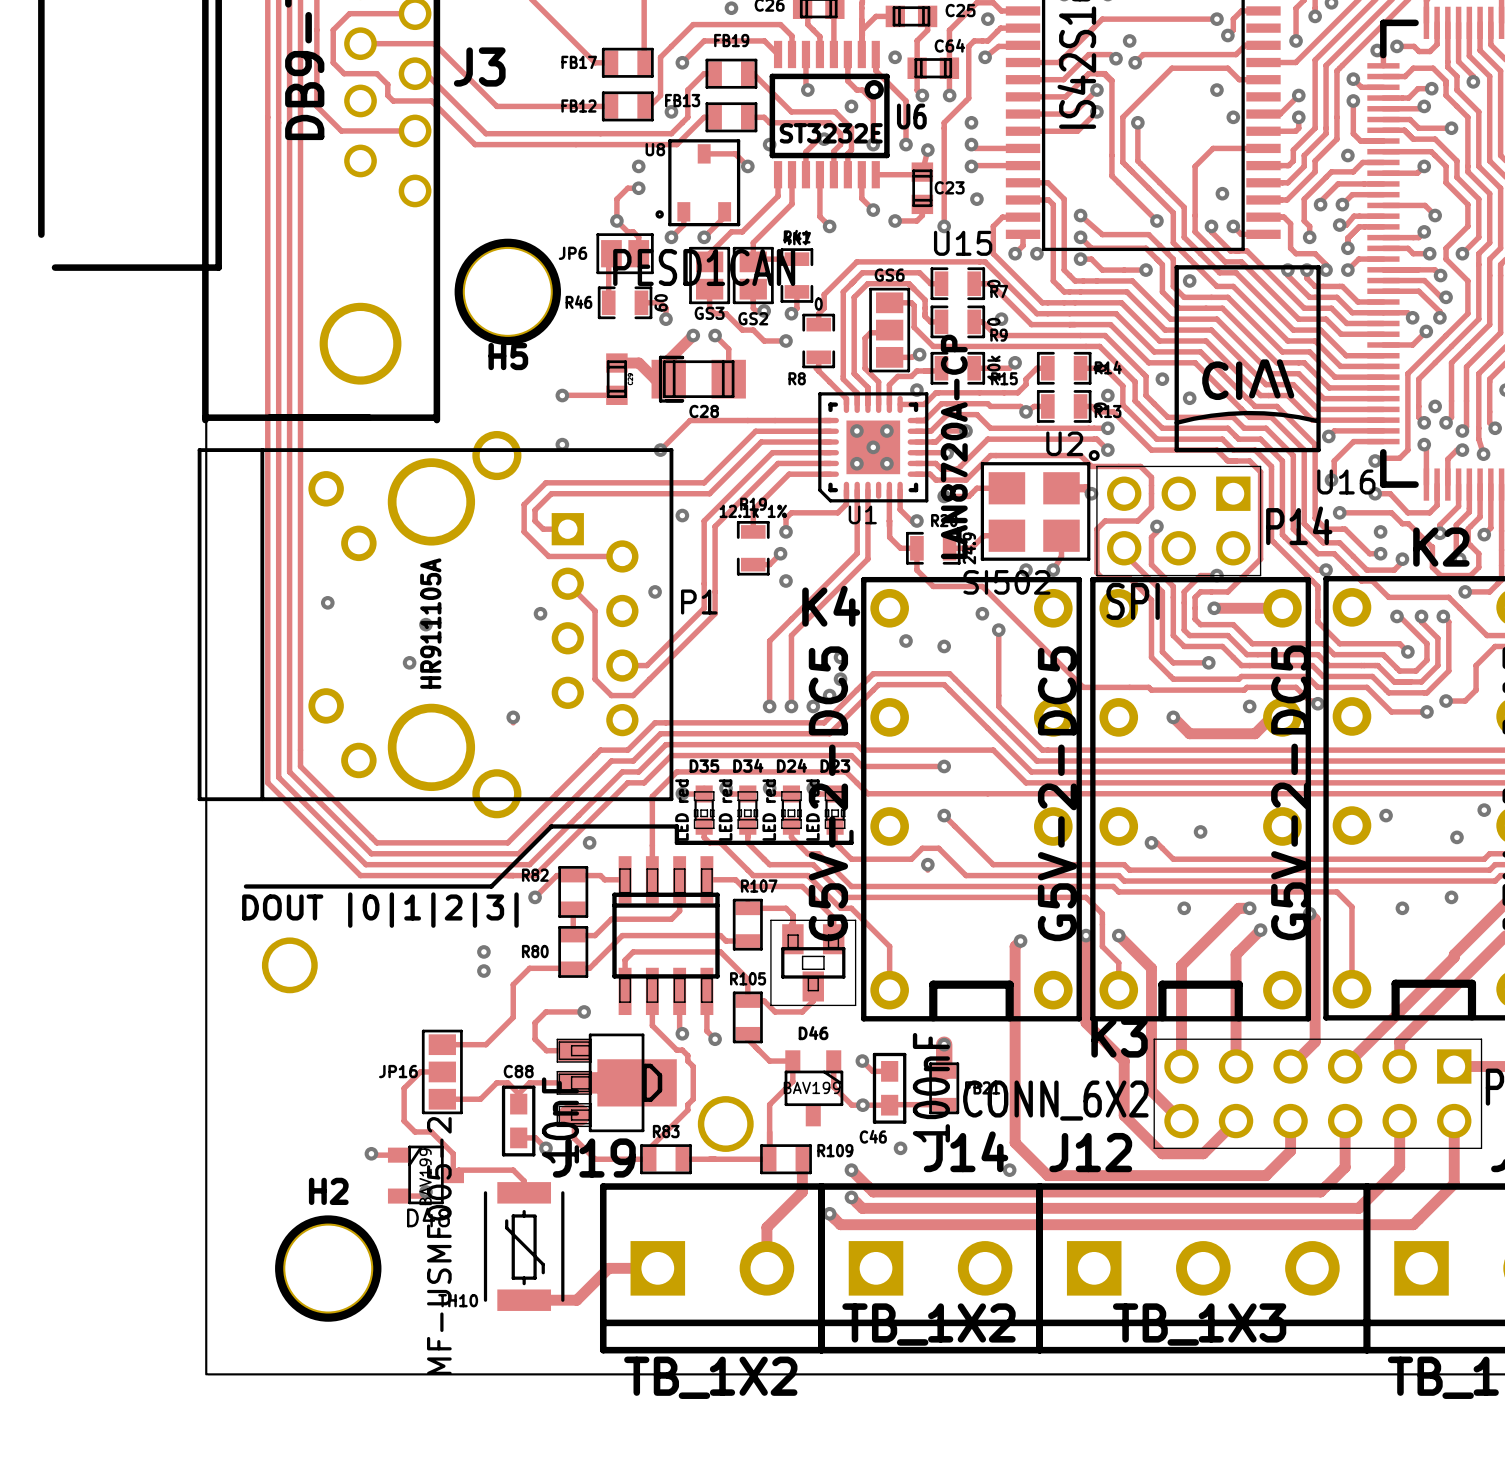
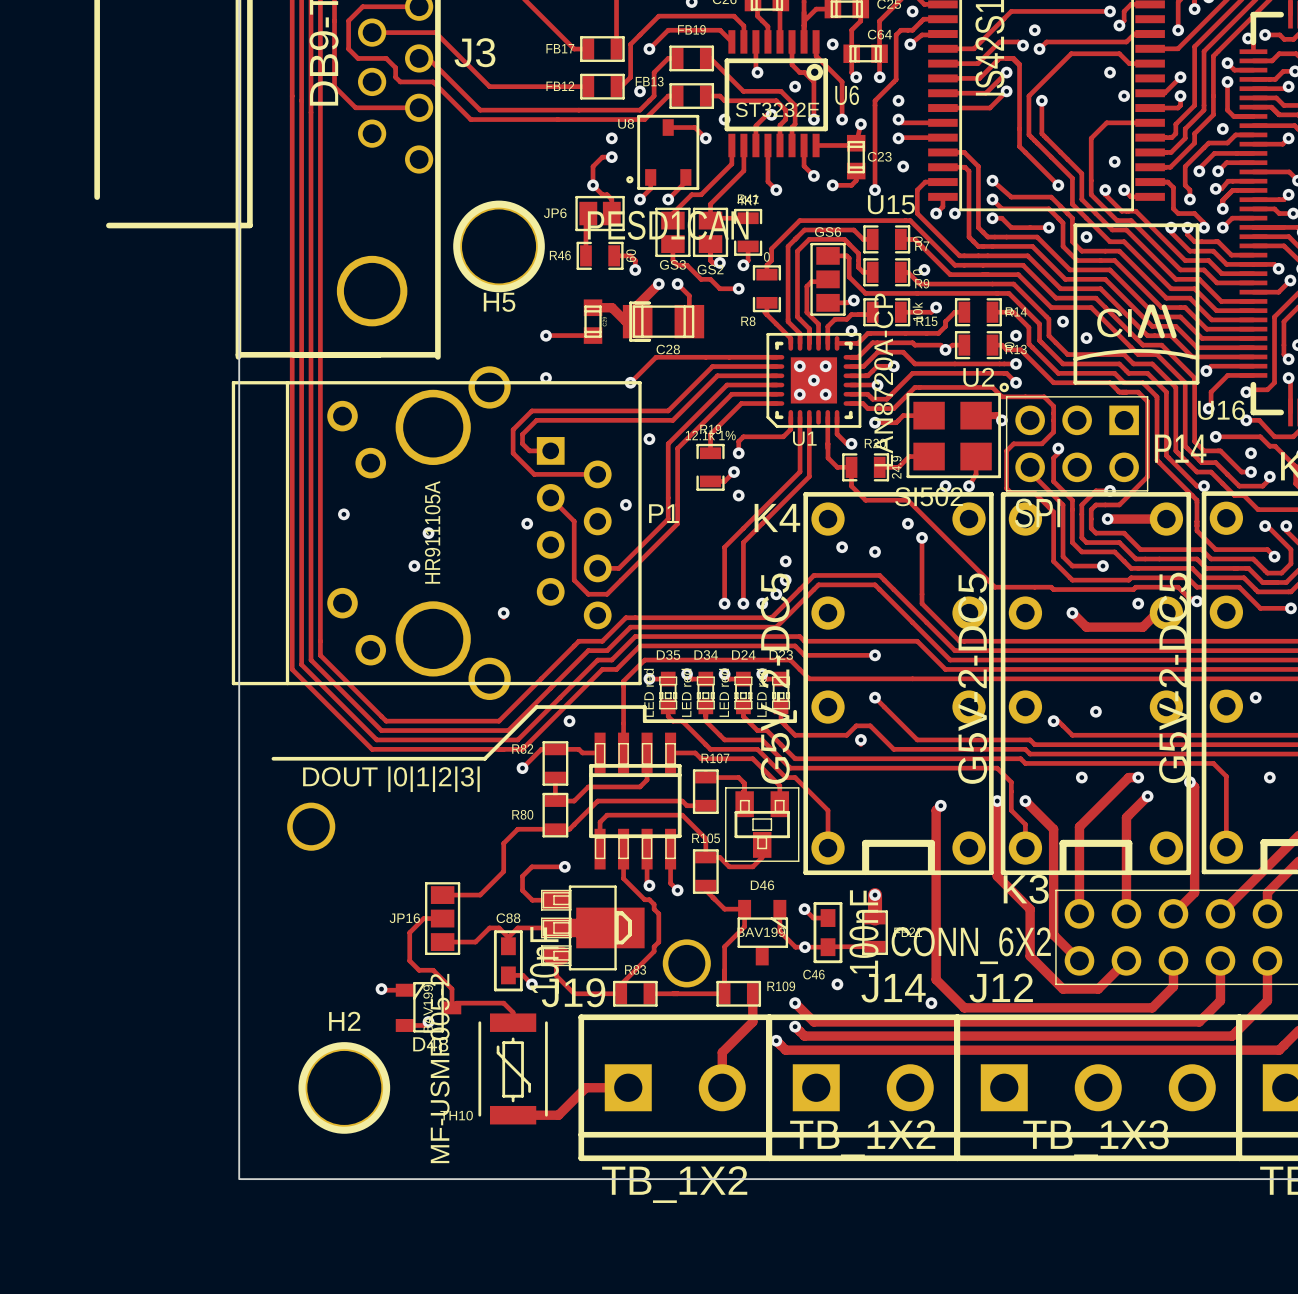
via: (483, 951) -> none
via: (483, 971) -> none

